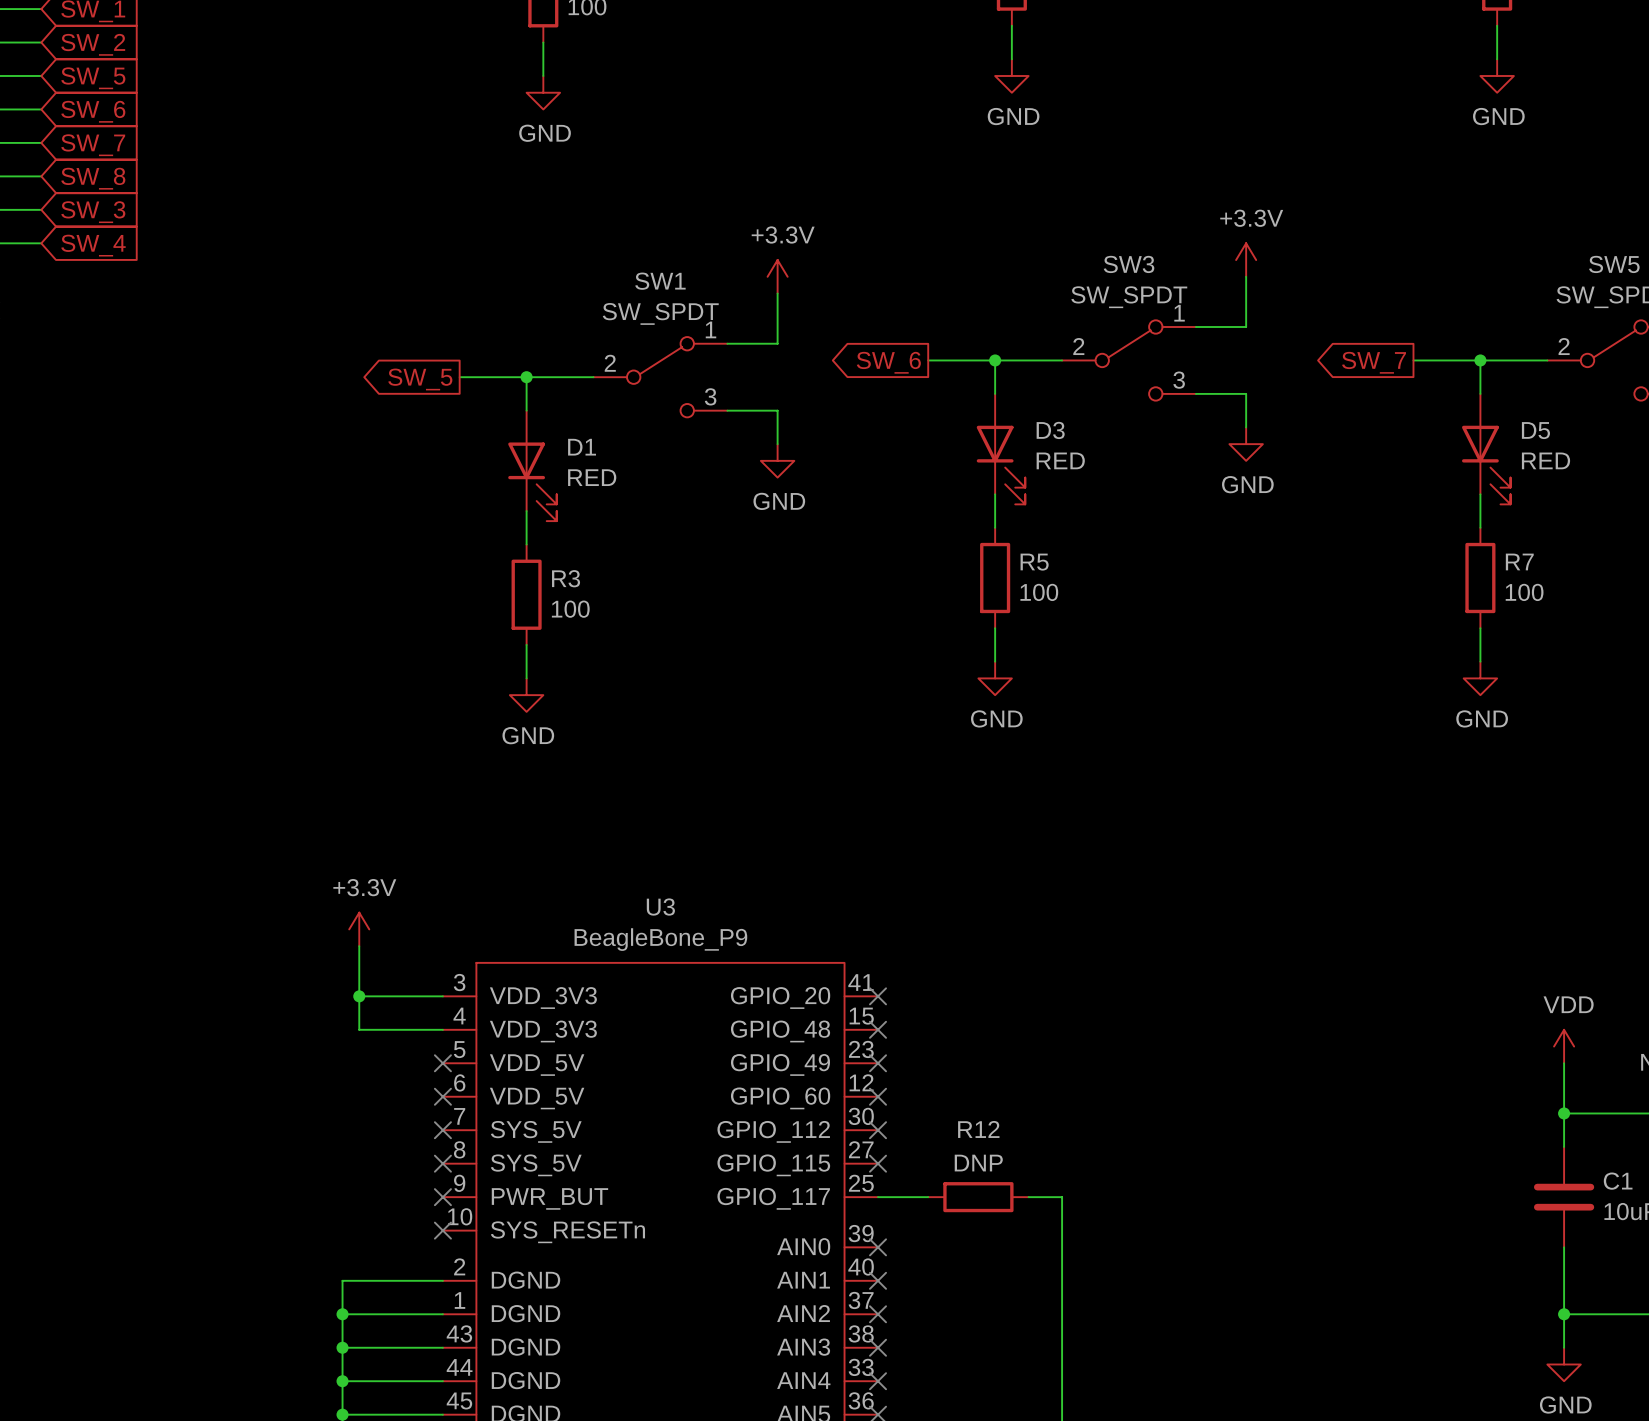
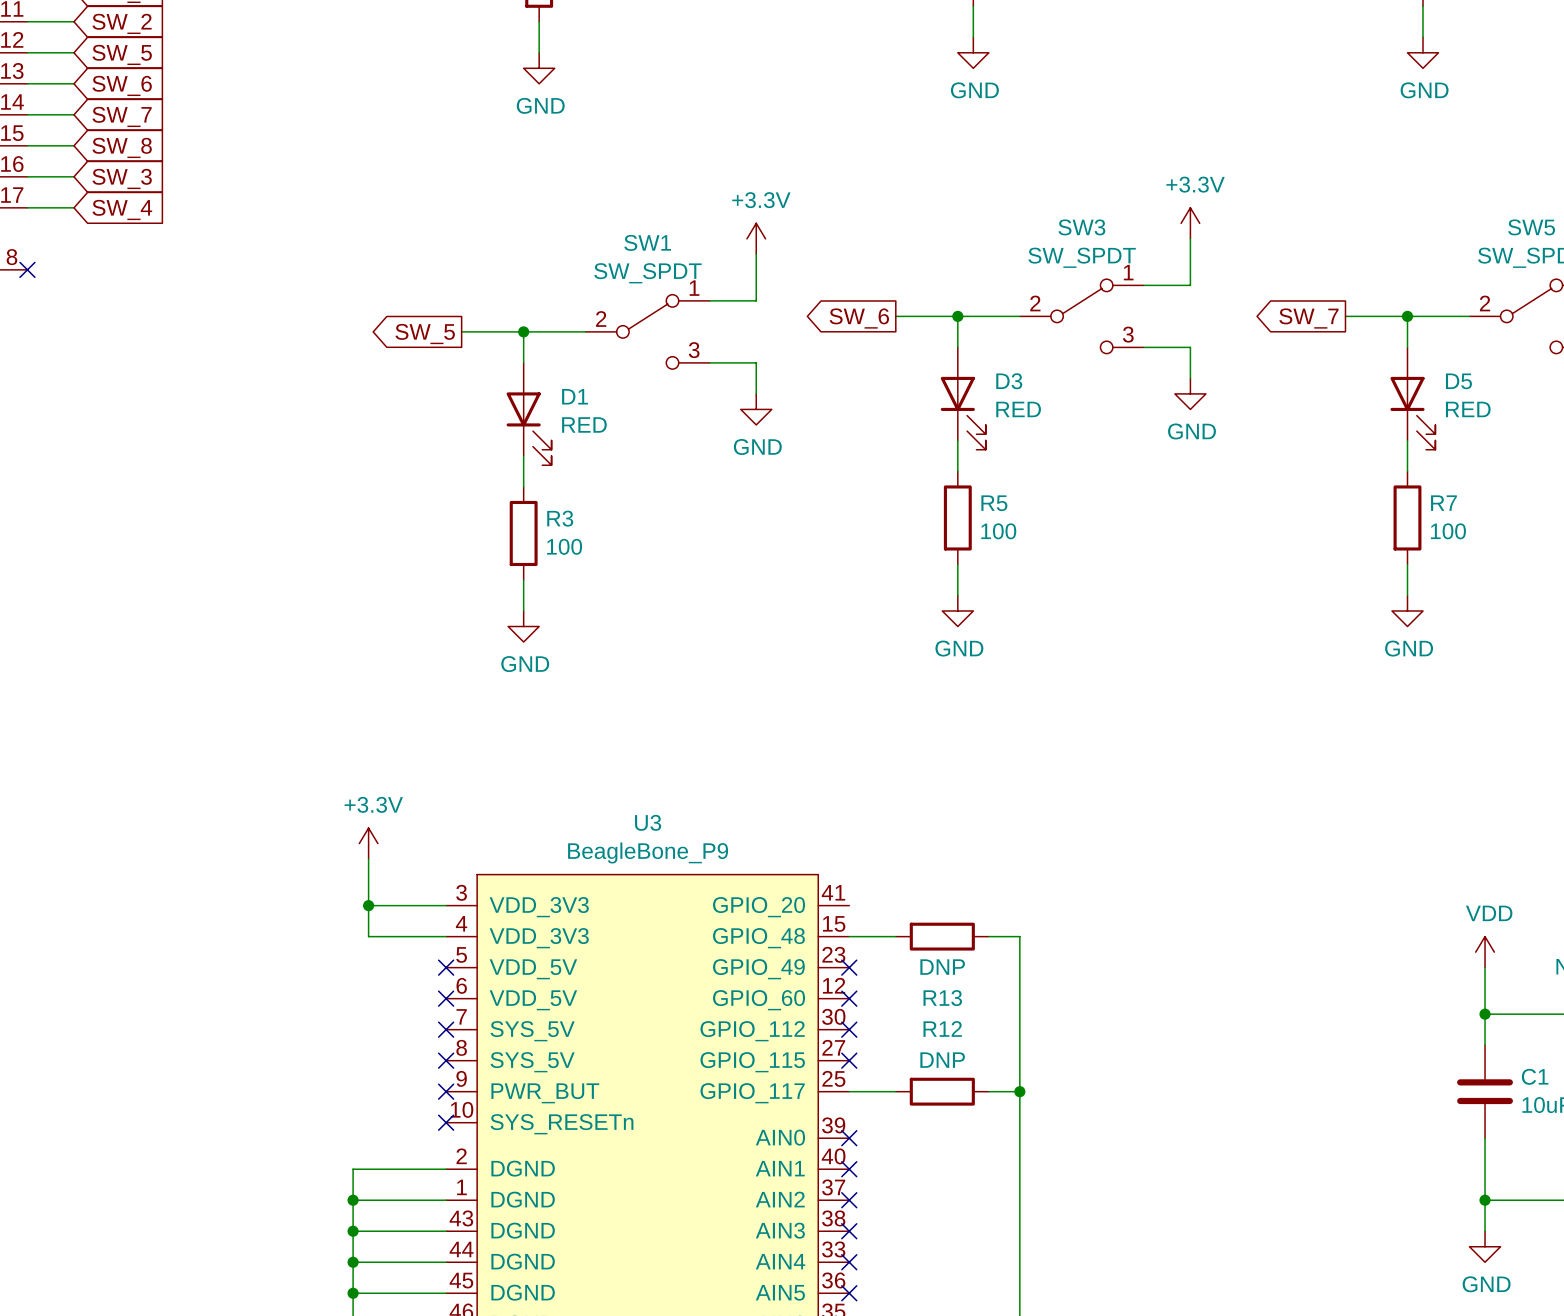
no-connect mark: (878, 996) -> none
wire: none -> (849, 936) (895, 936)
no-connect mark: (878, 1029) -> none
R13: none -> DNP (942, 936)
wire: none -> (988, 936) (1019, 936) (1019, 1091)
junction: none -> (1019, 1091)

